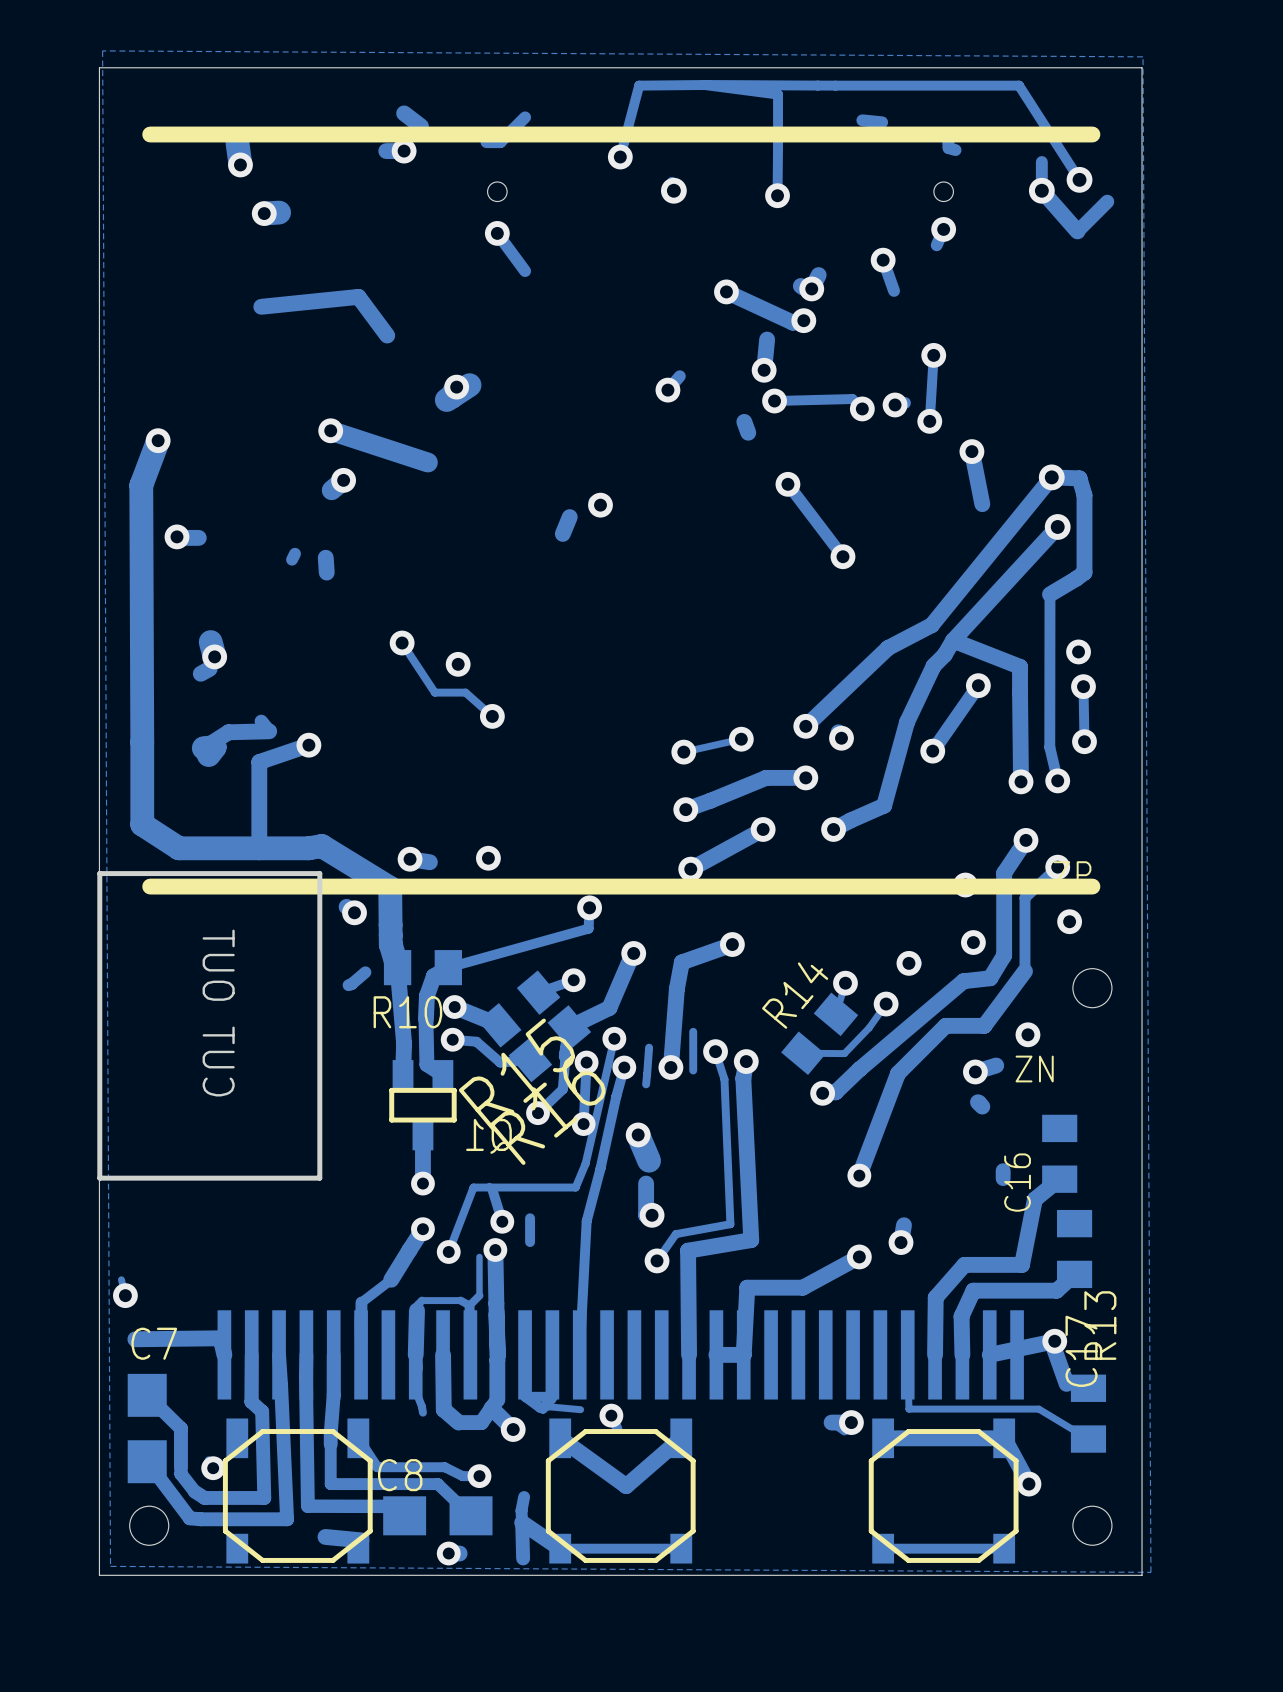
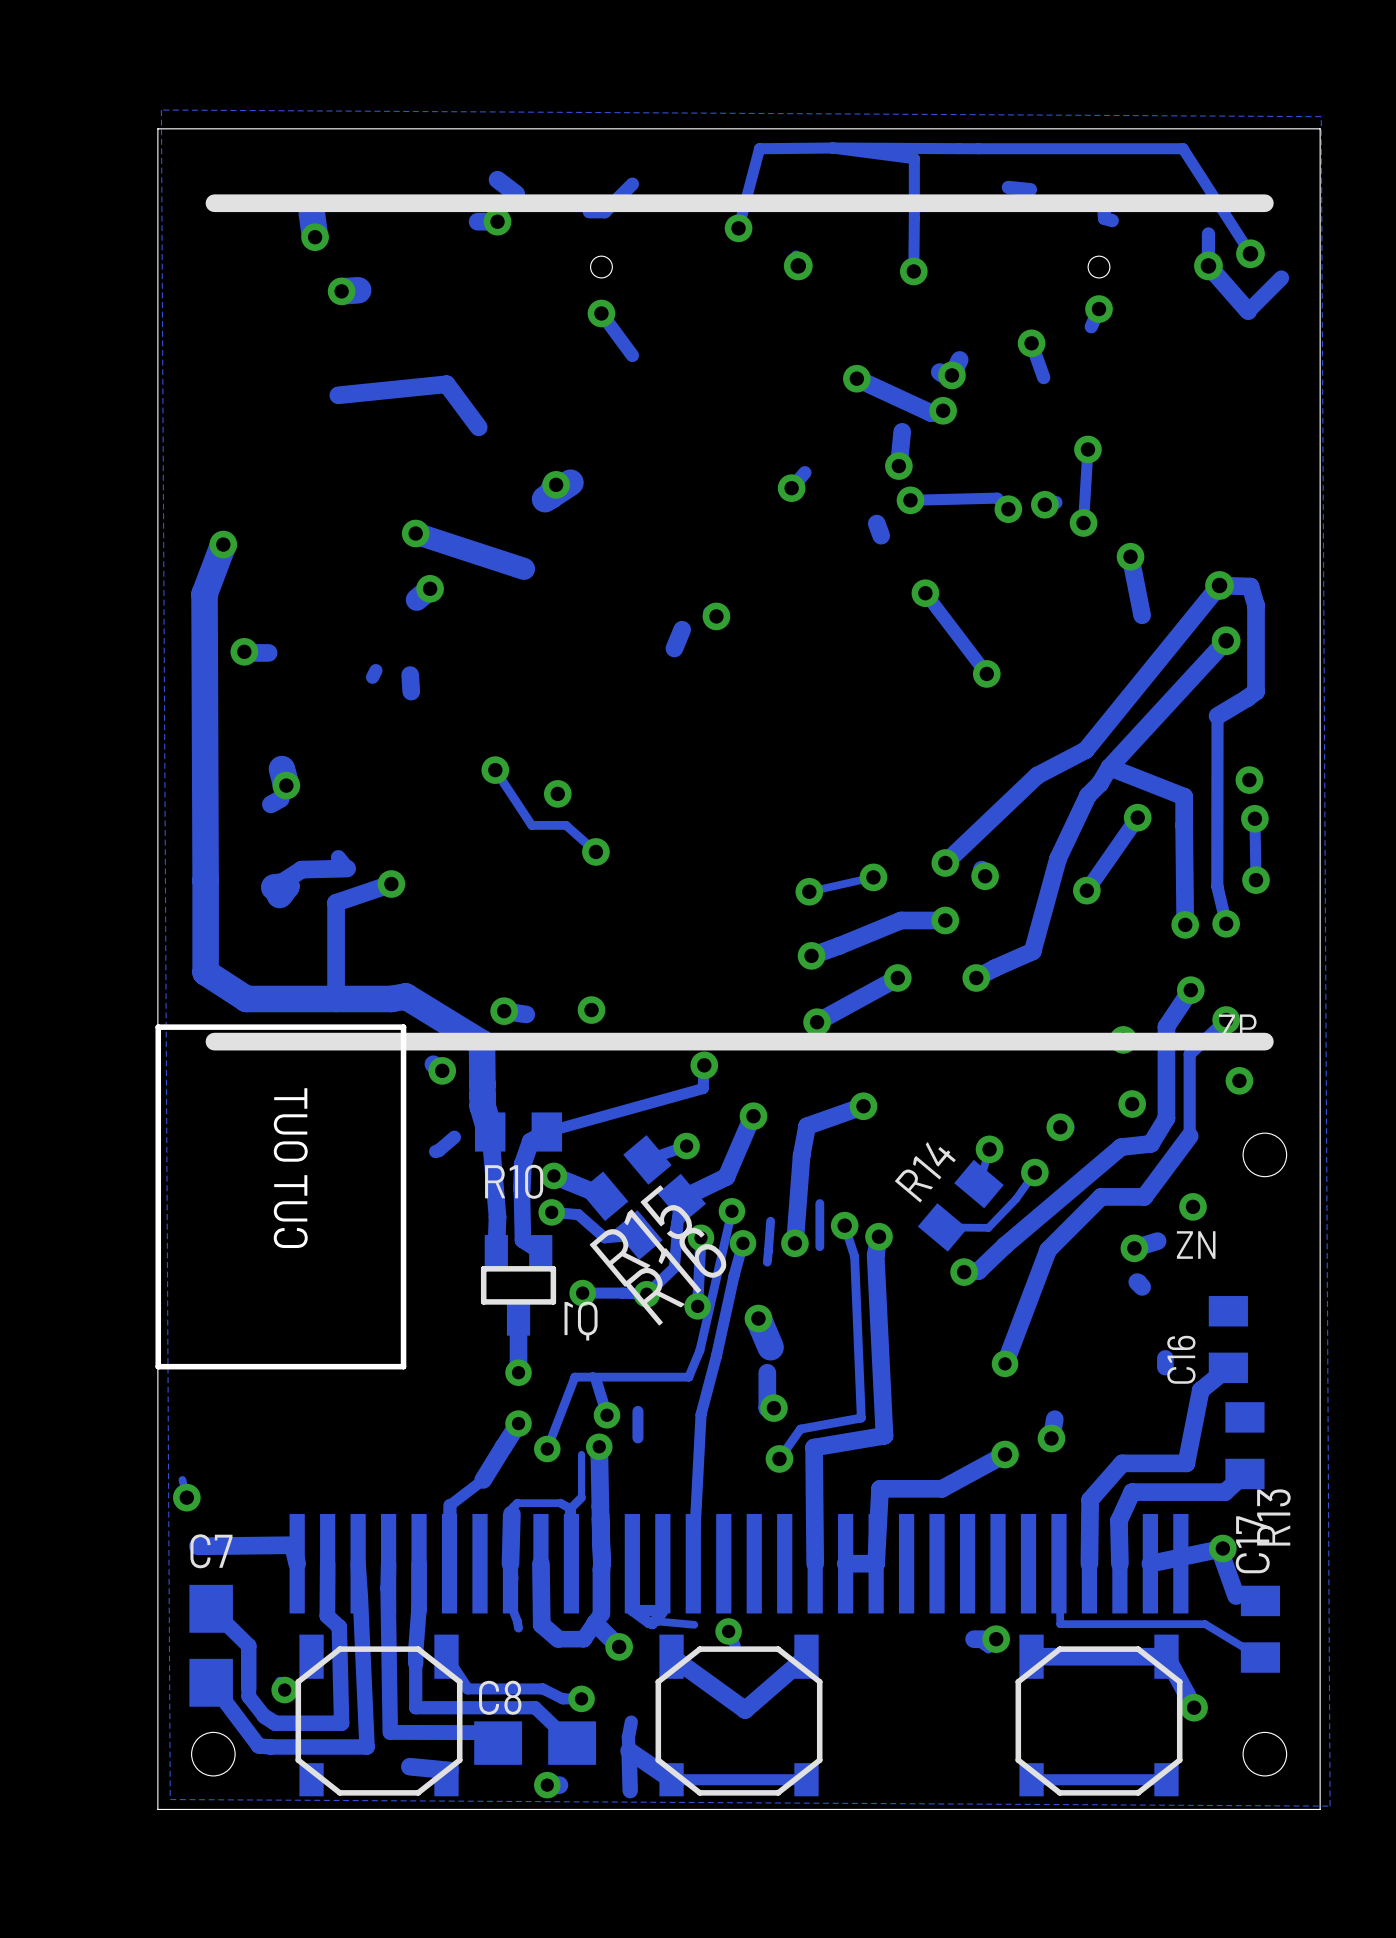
track: none -> (582, 1293) (646, 1294)
via: none -> (582, 1293)

